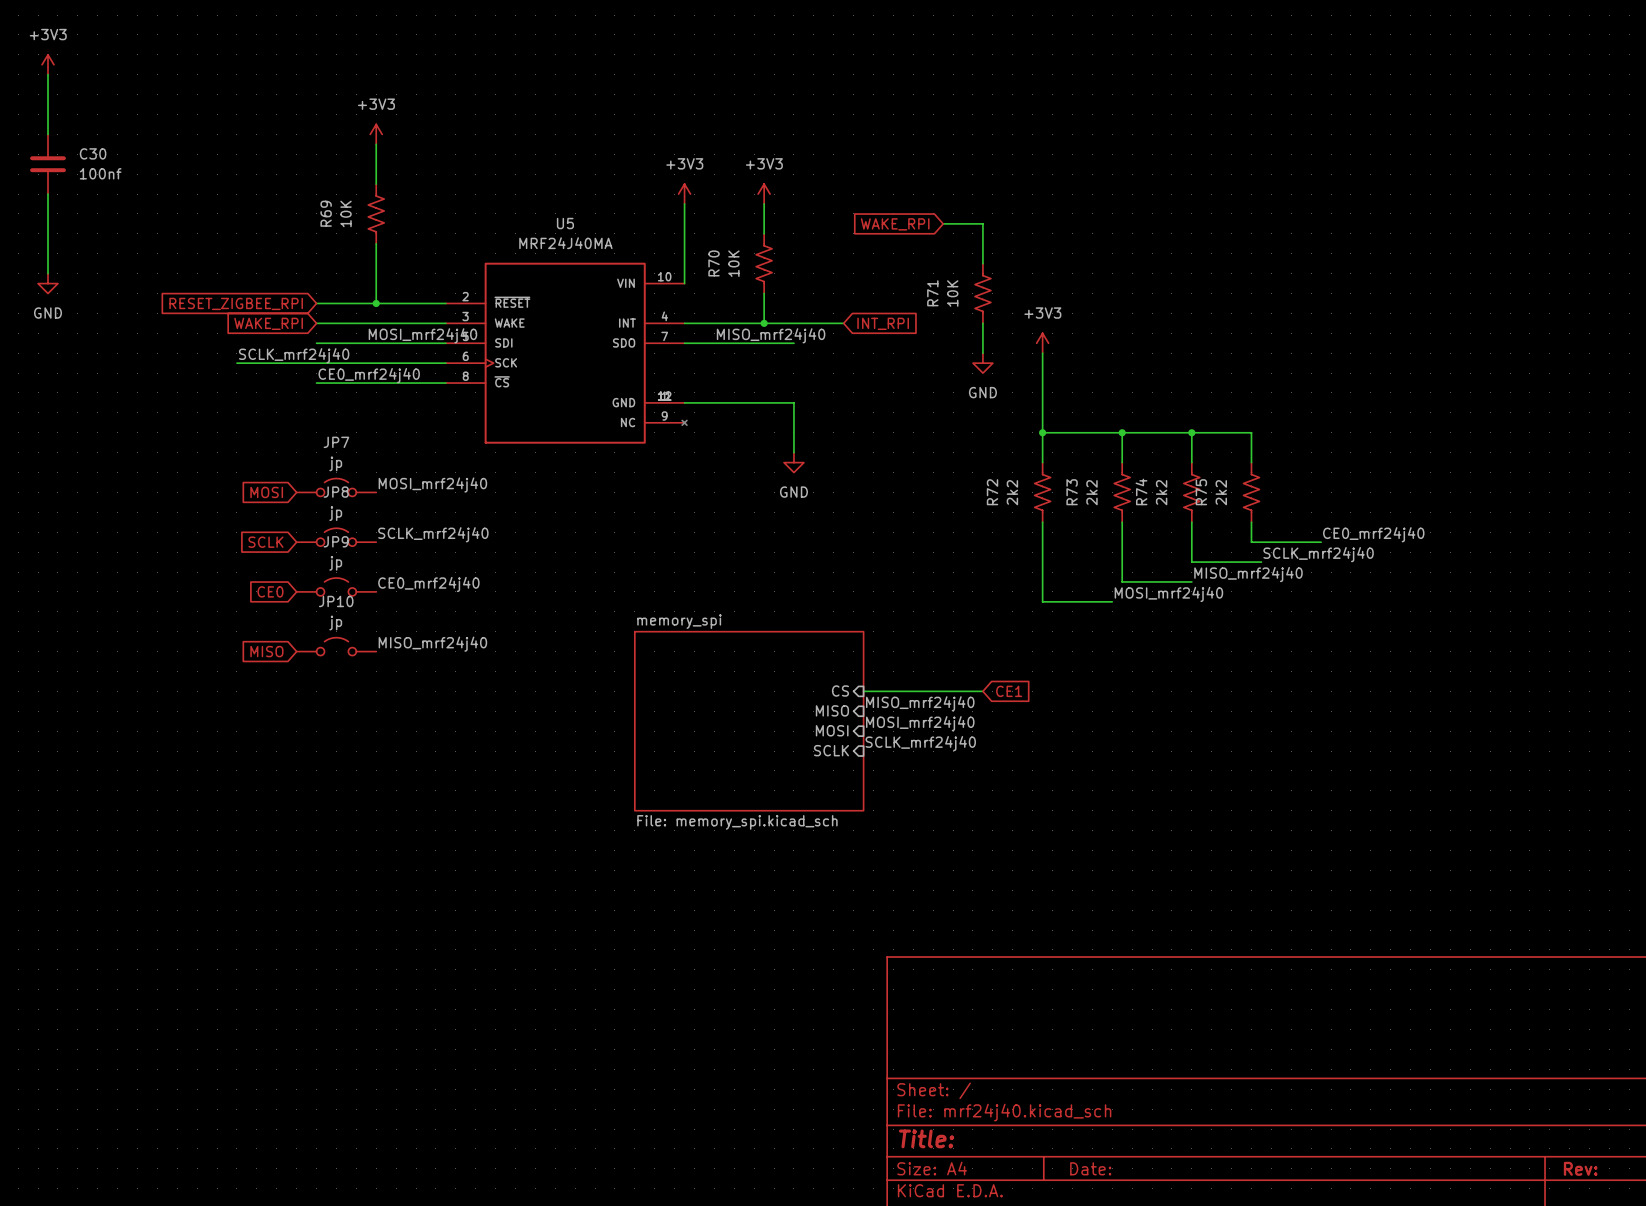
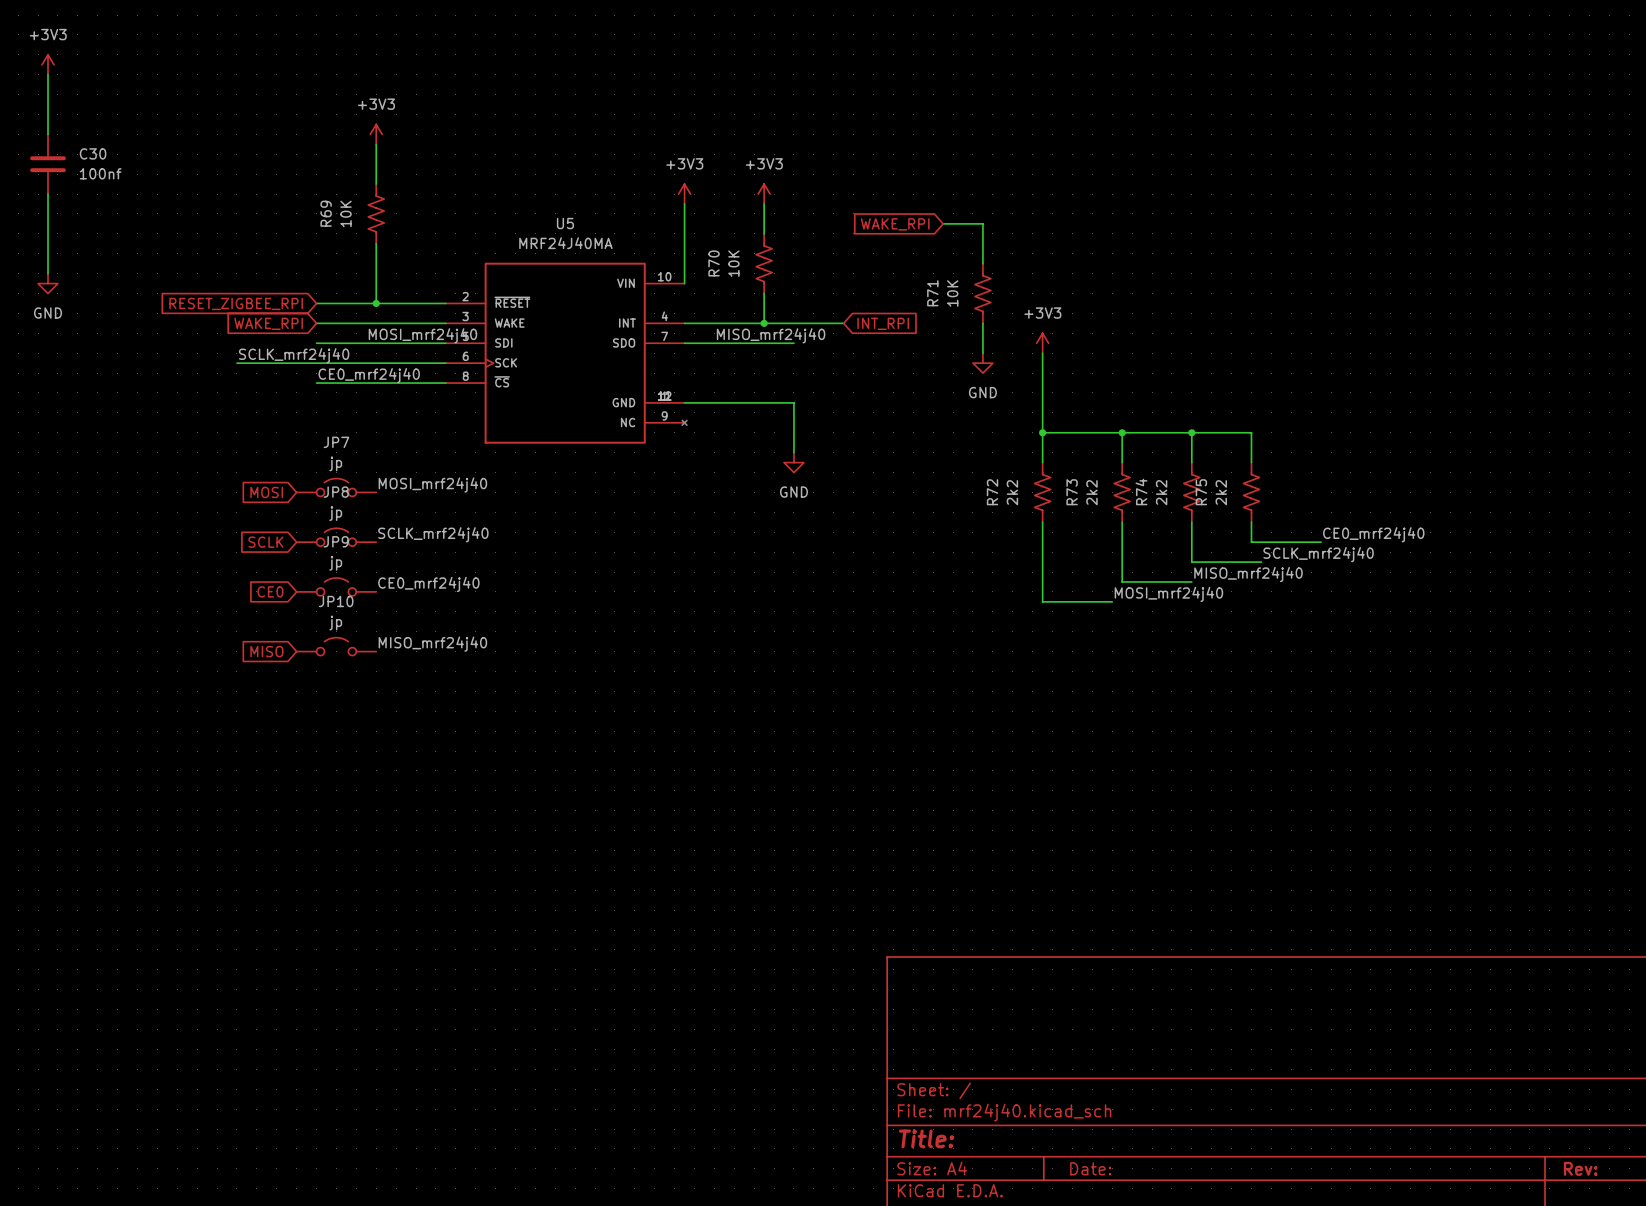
sheet pin: CS (840, 691) -> none
wire: (863, 691) (982, 691) -> none
global label: CE1 (1009, 691) -> none
label: MISO_mrf24j40 (920, 703) -> none
sheet pin: MISO (832, 710) -> none
sheet memory_spi: File: memory_spi.kicad_sch (749, 721) -> none
label: MOSI_mrf24j40 (920, 723) -> none
sheet pin: MOSI (832, 730) -> none
label: SCLK_mrf24j40 (920, 743) -> none
sheet pin: SCLK (831, 750) -> none

